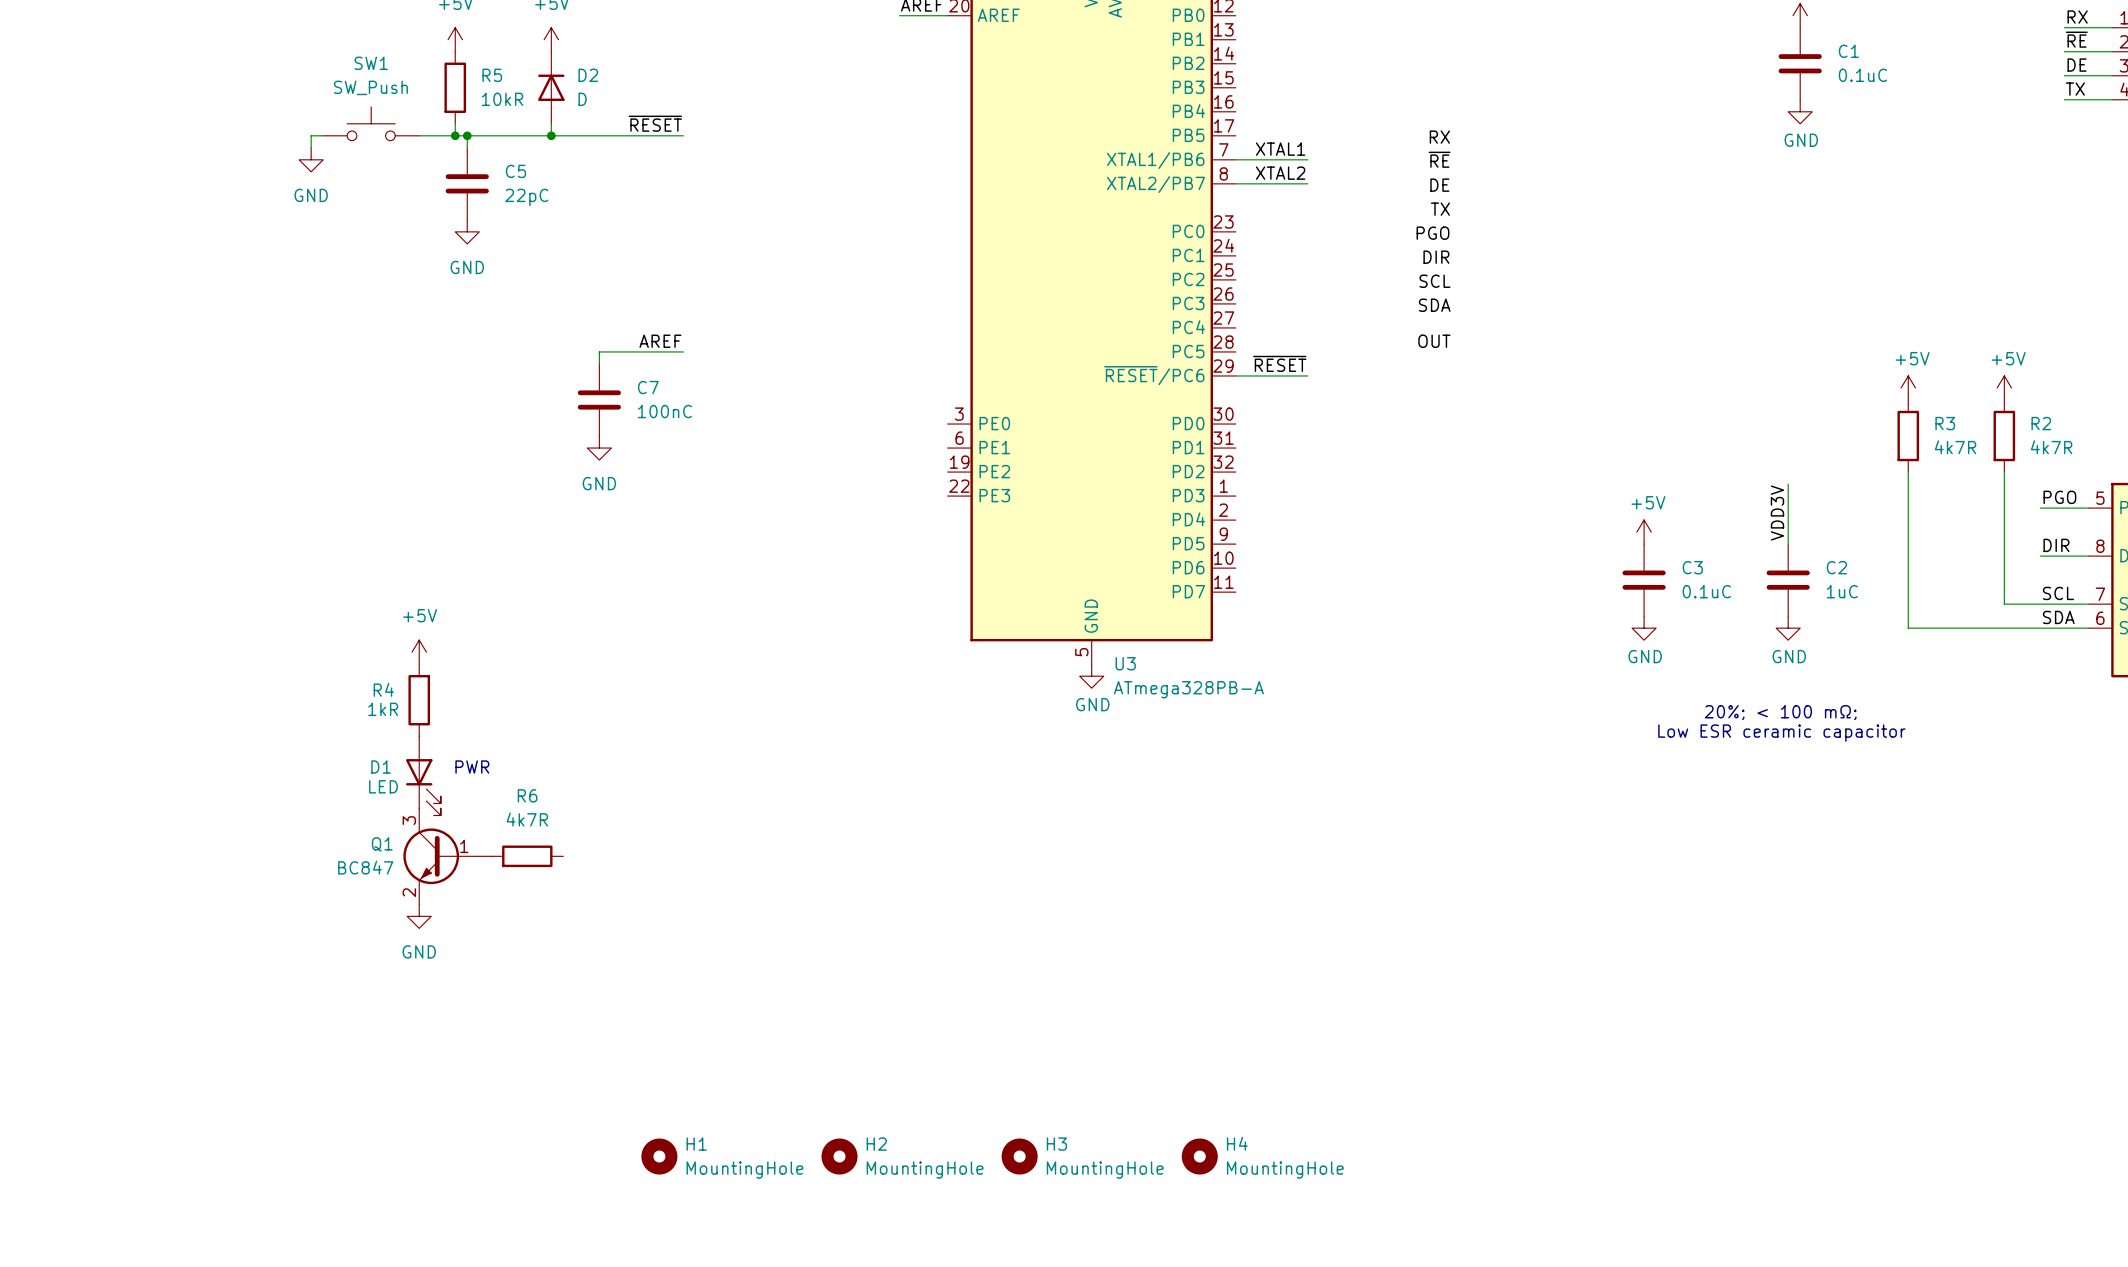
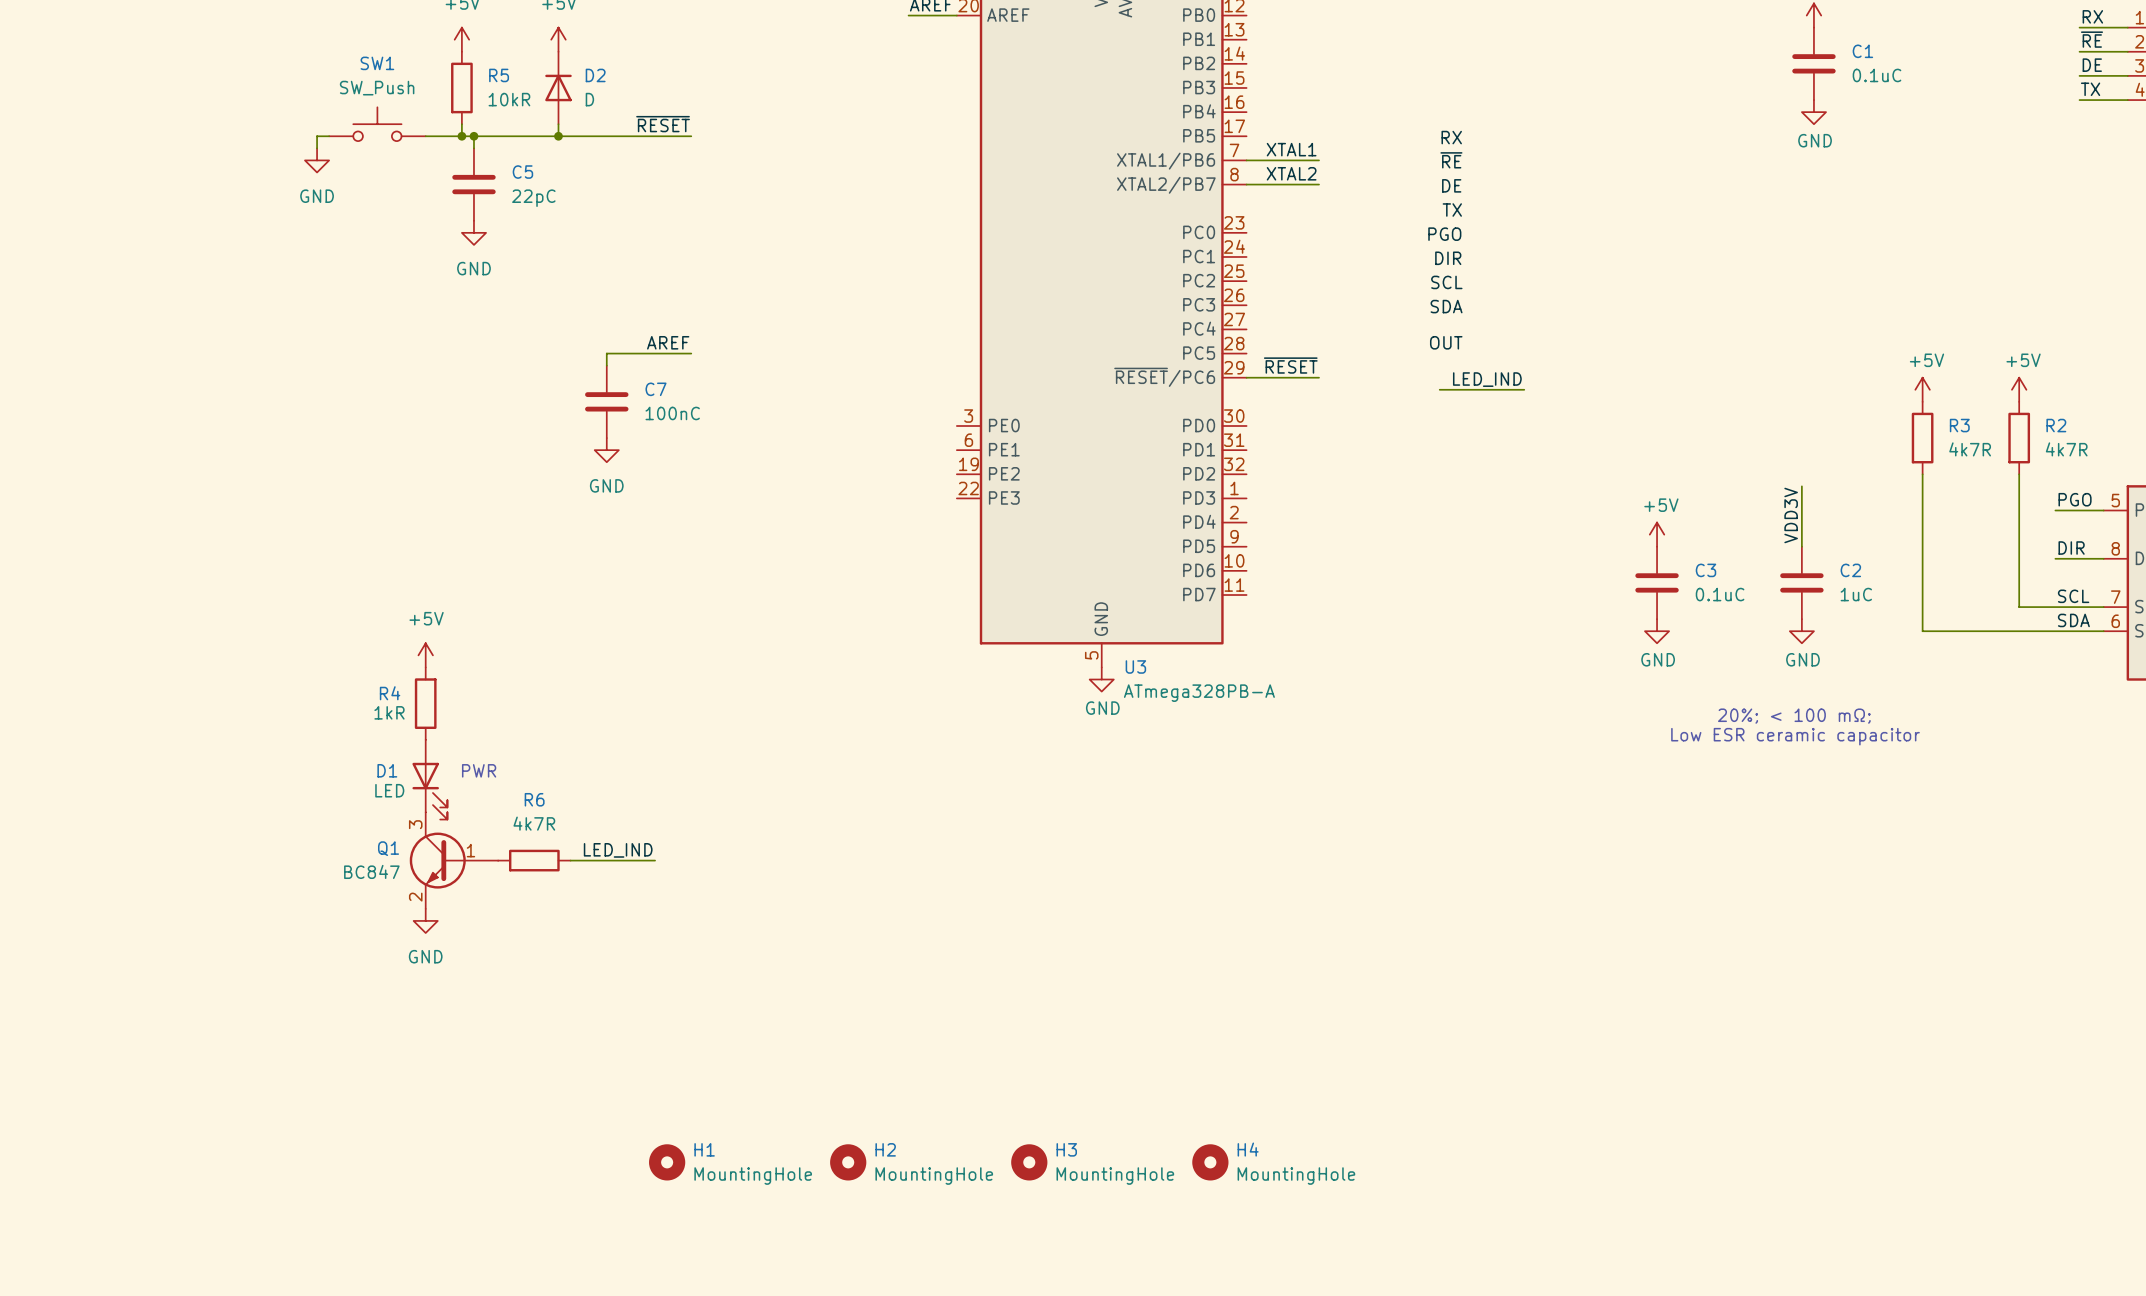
label: none -> LED_IND (1487, 379)
wire: none -> (1439, 389) (1524, 389)
label: none -> LED_IND (618, 850)
wire: none -> (570, 860) (655, 860)

